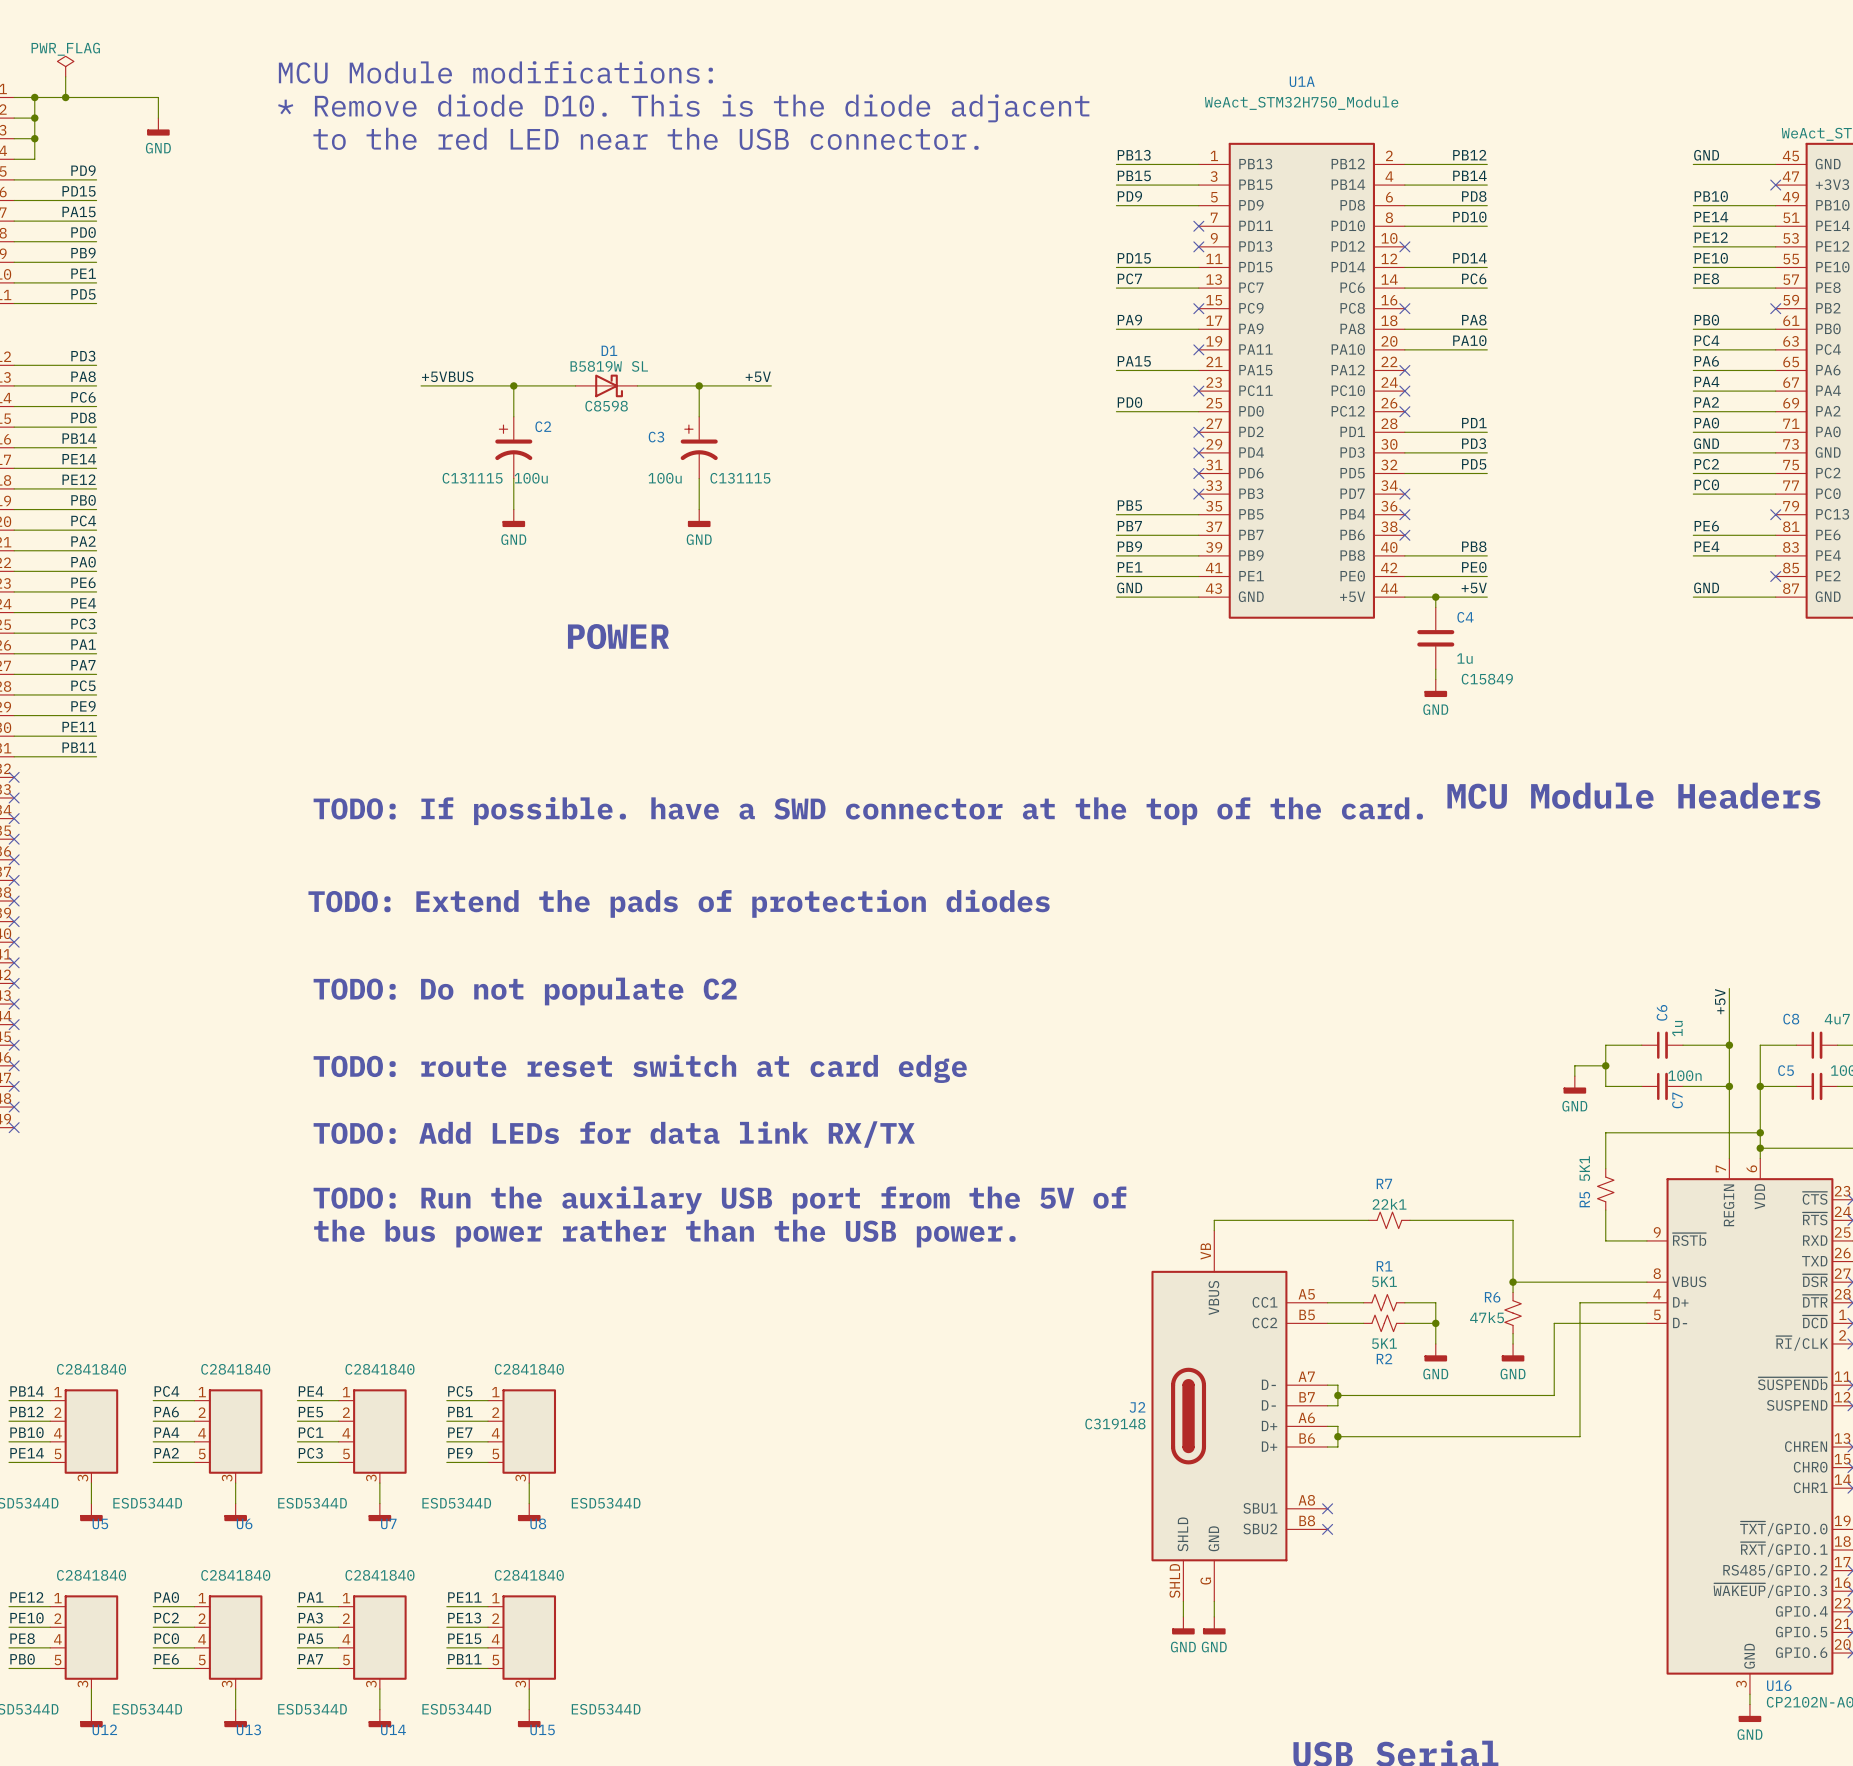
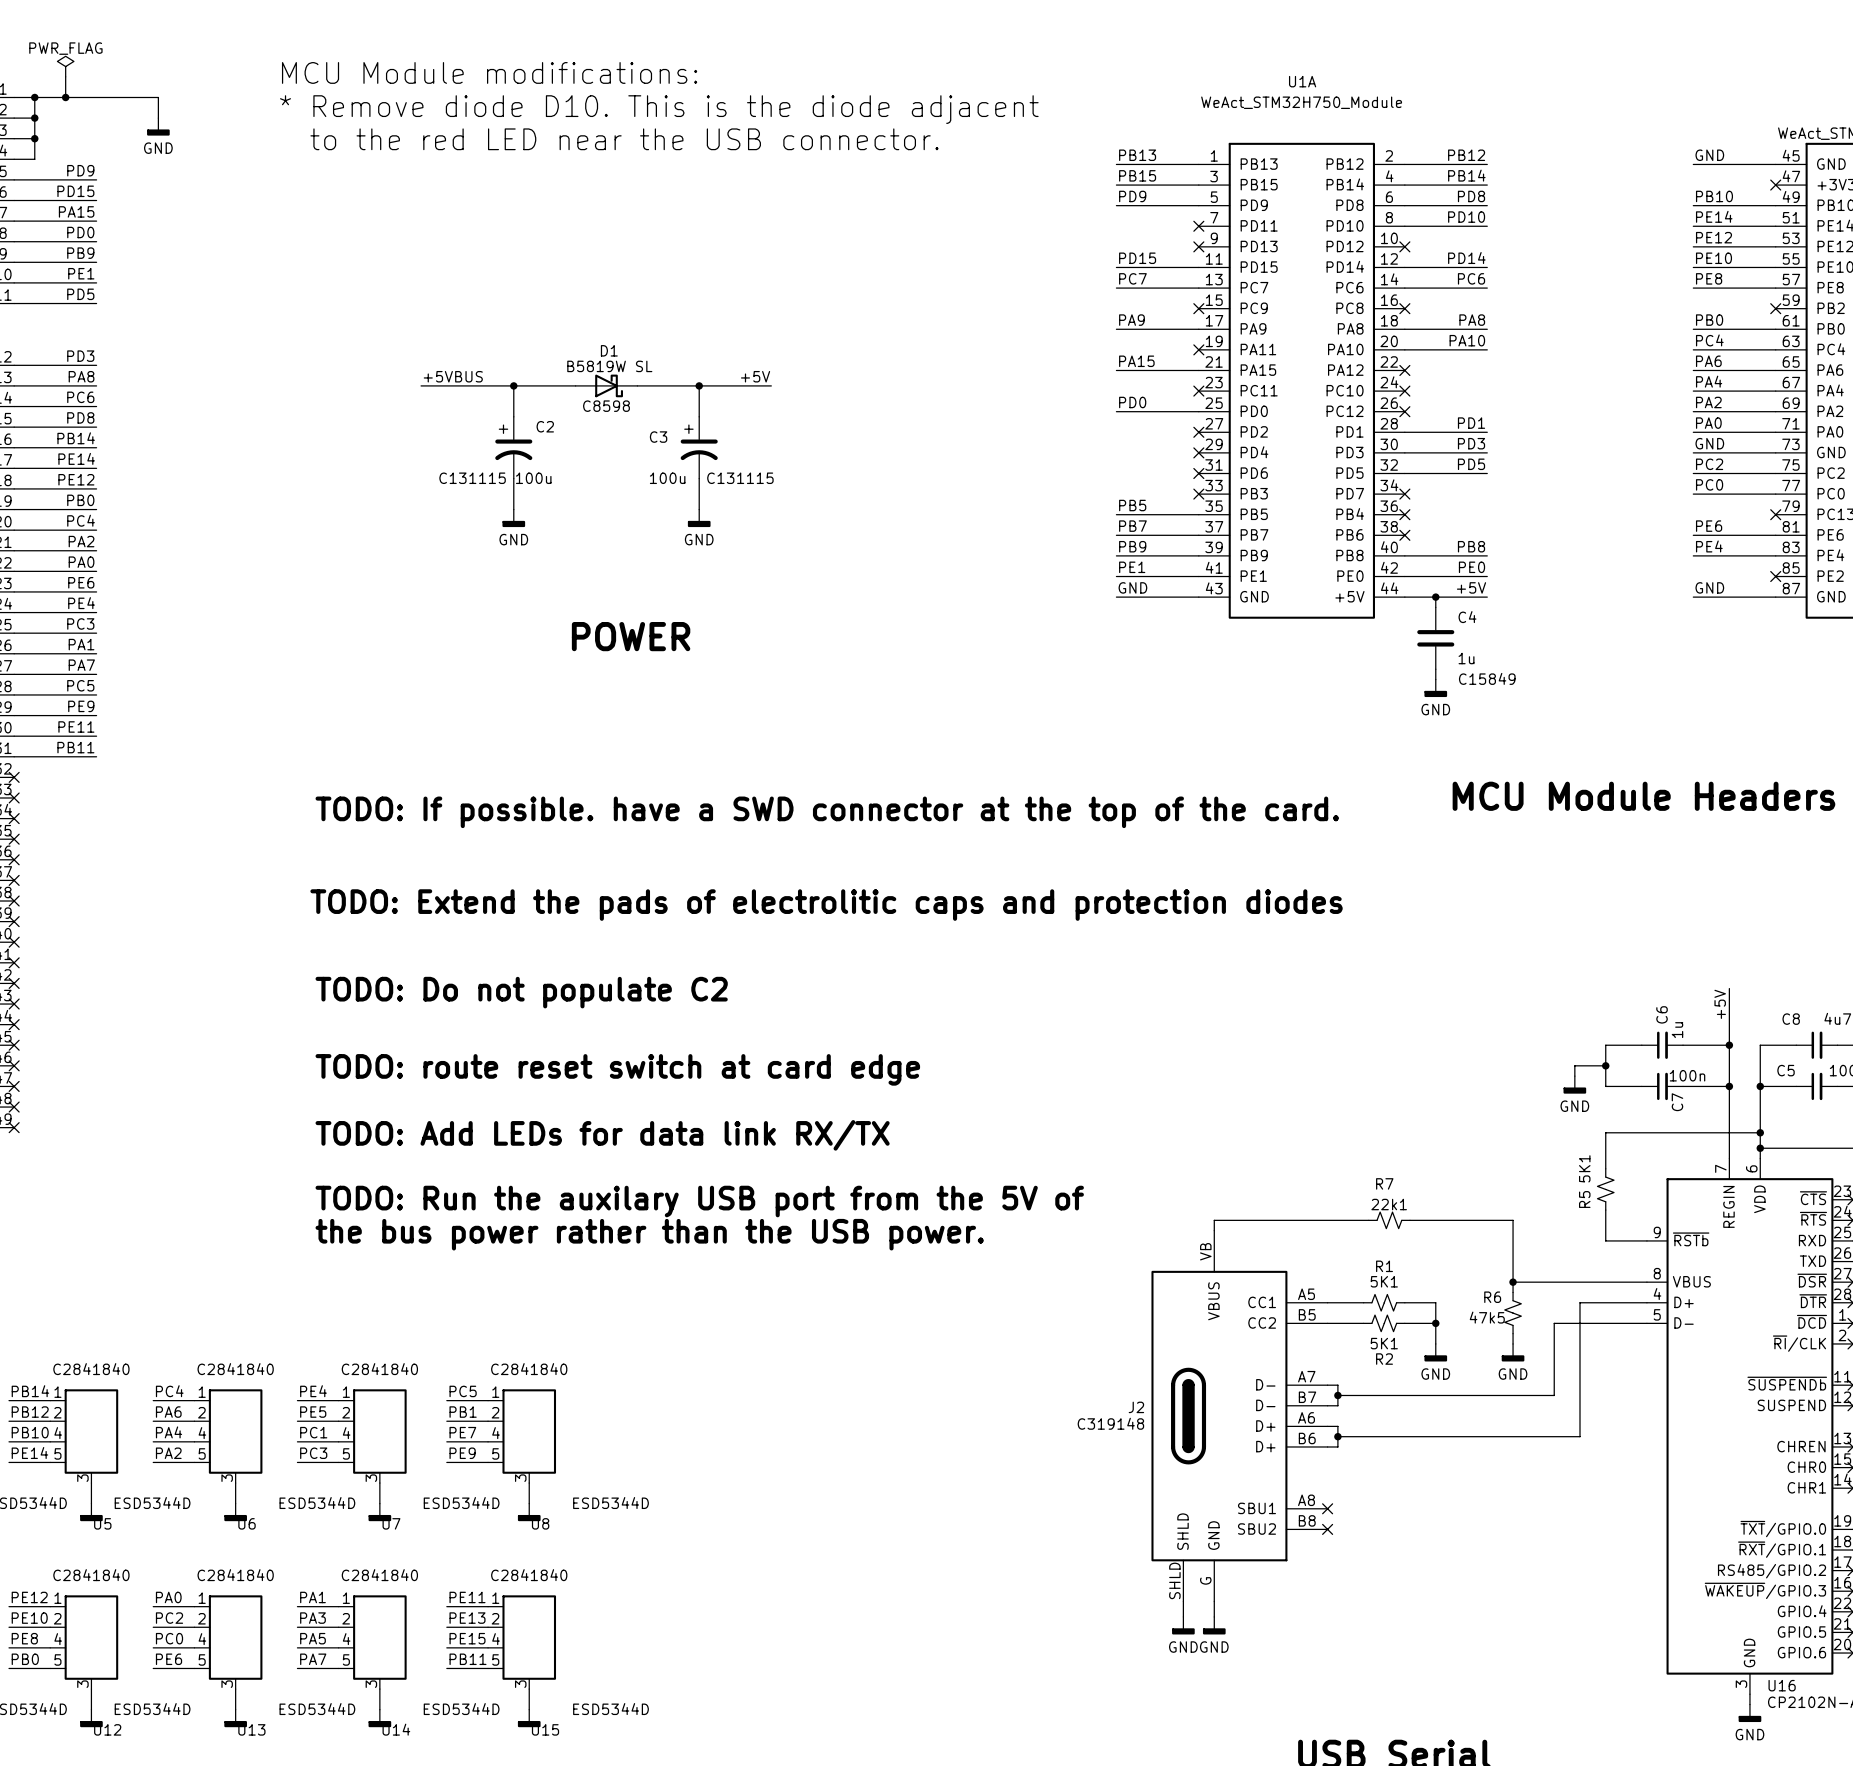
text: TODO: Extend the pads of protection diodes (679, 903) -> TODO: Extend the pads of electrolitic caps and protection diodes (826, 905)

